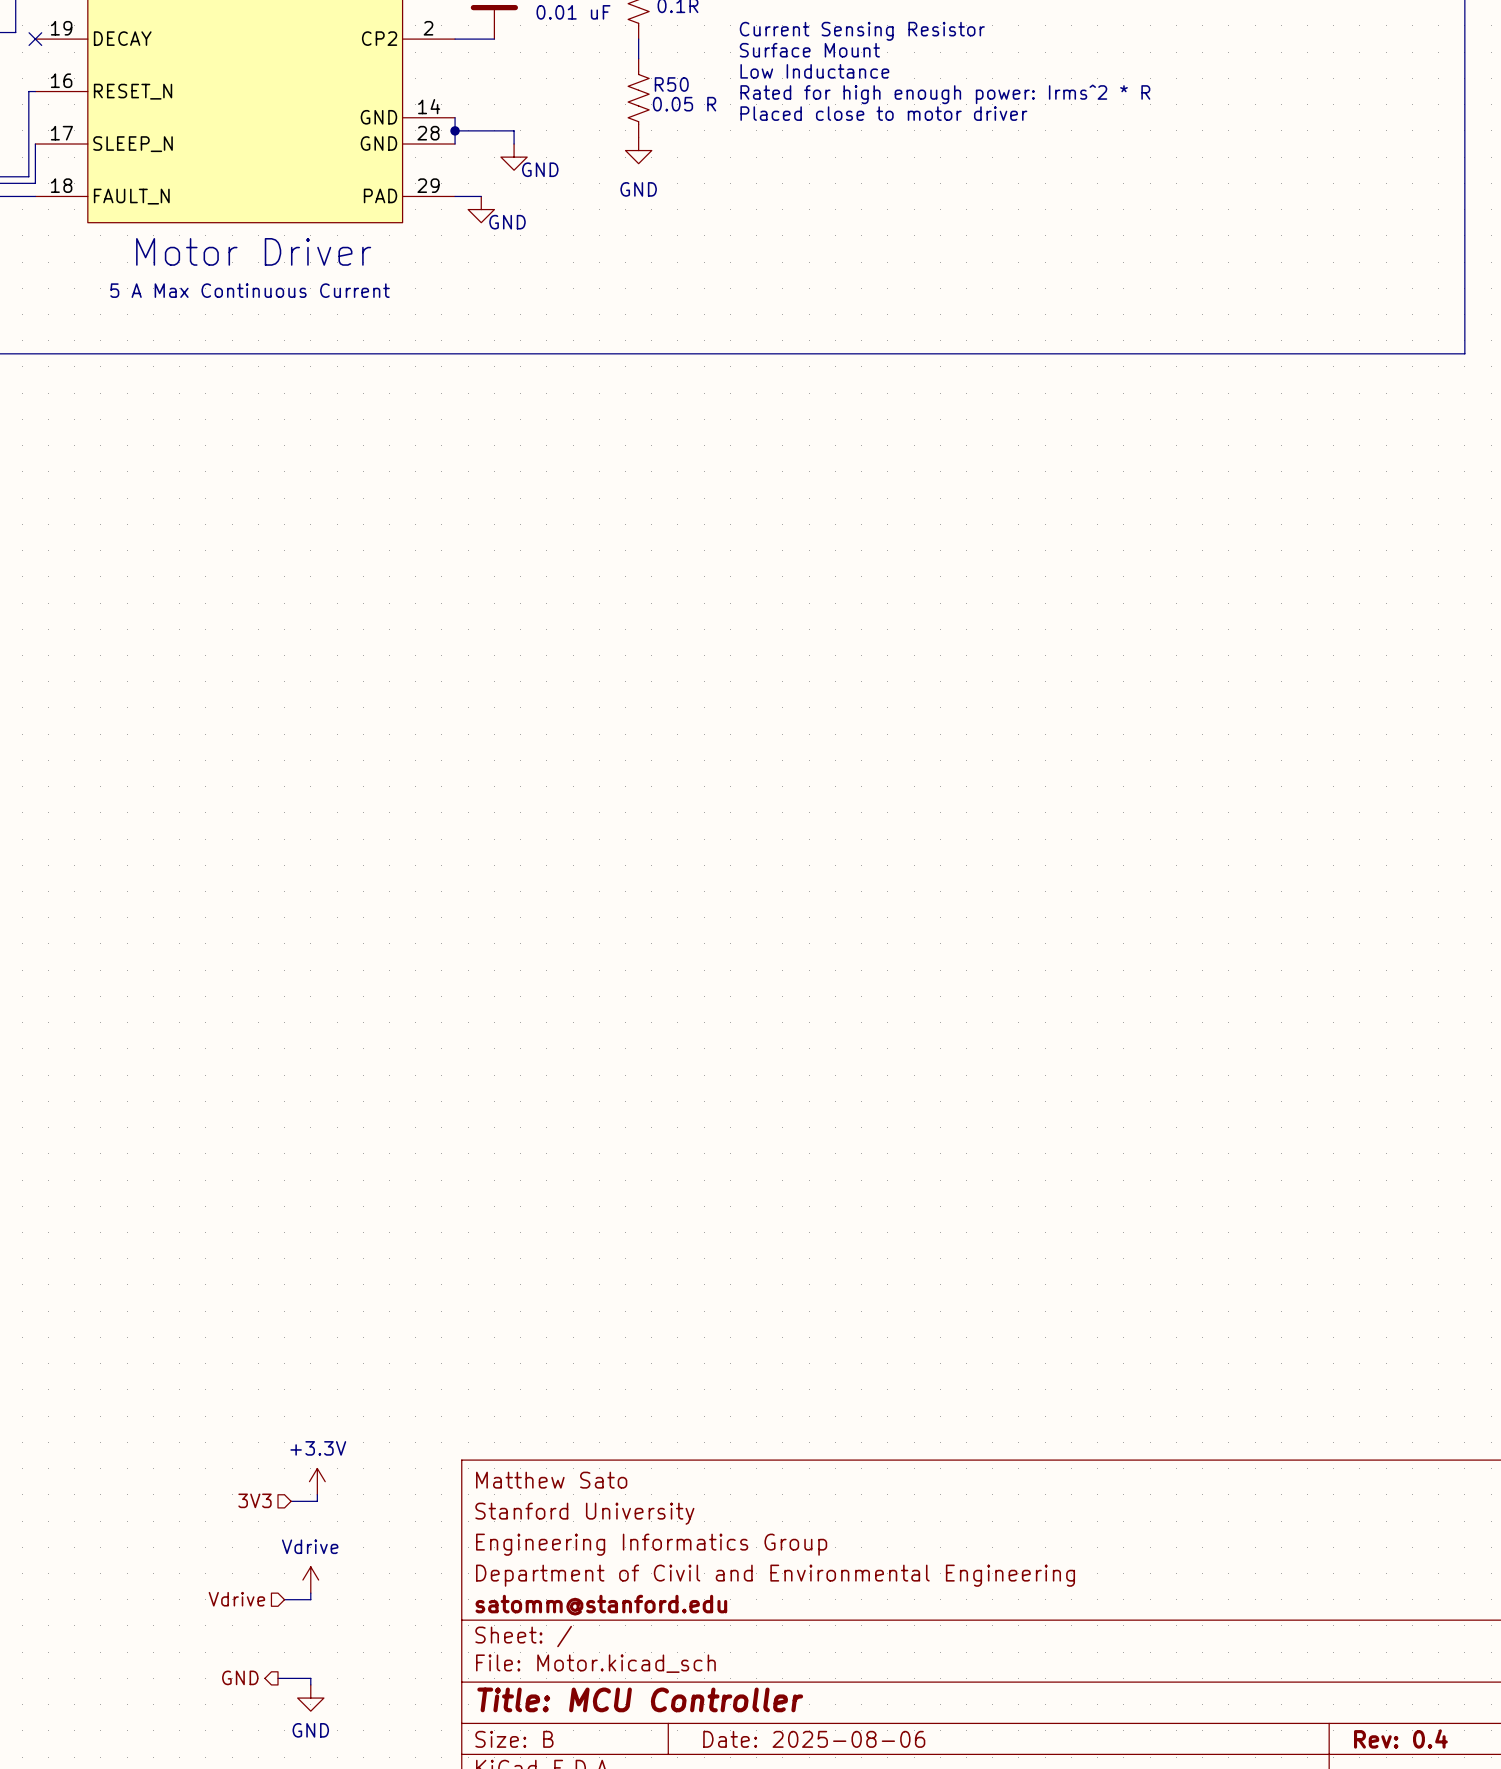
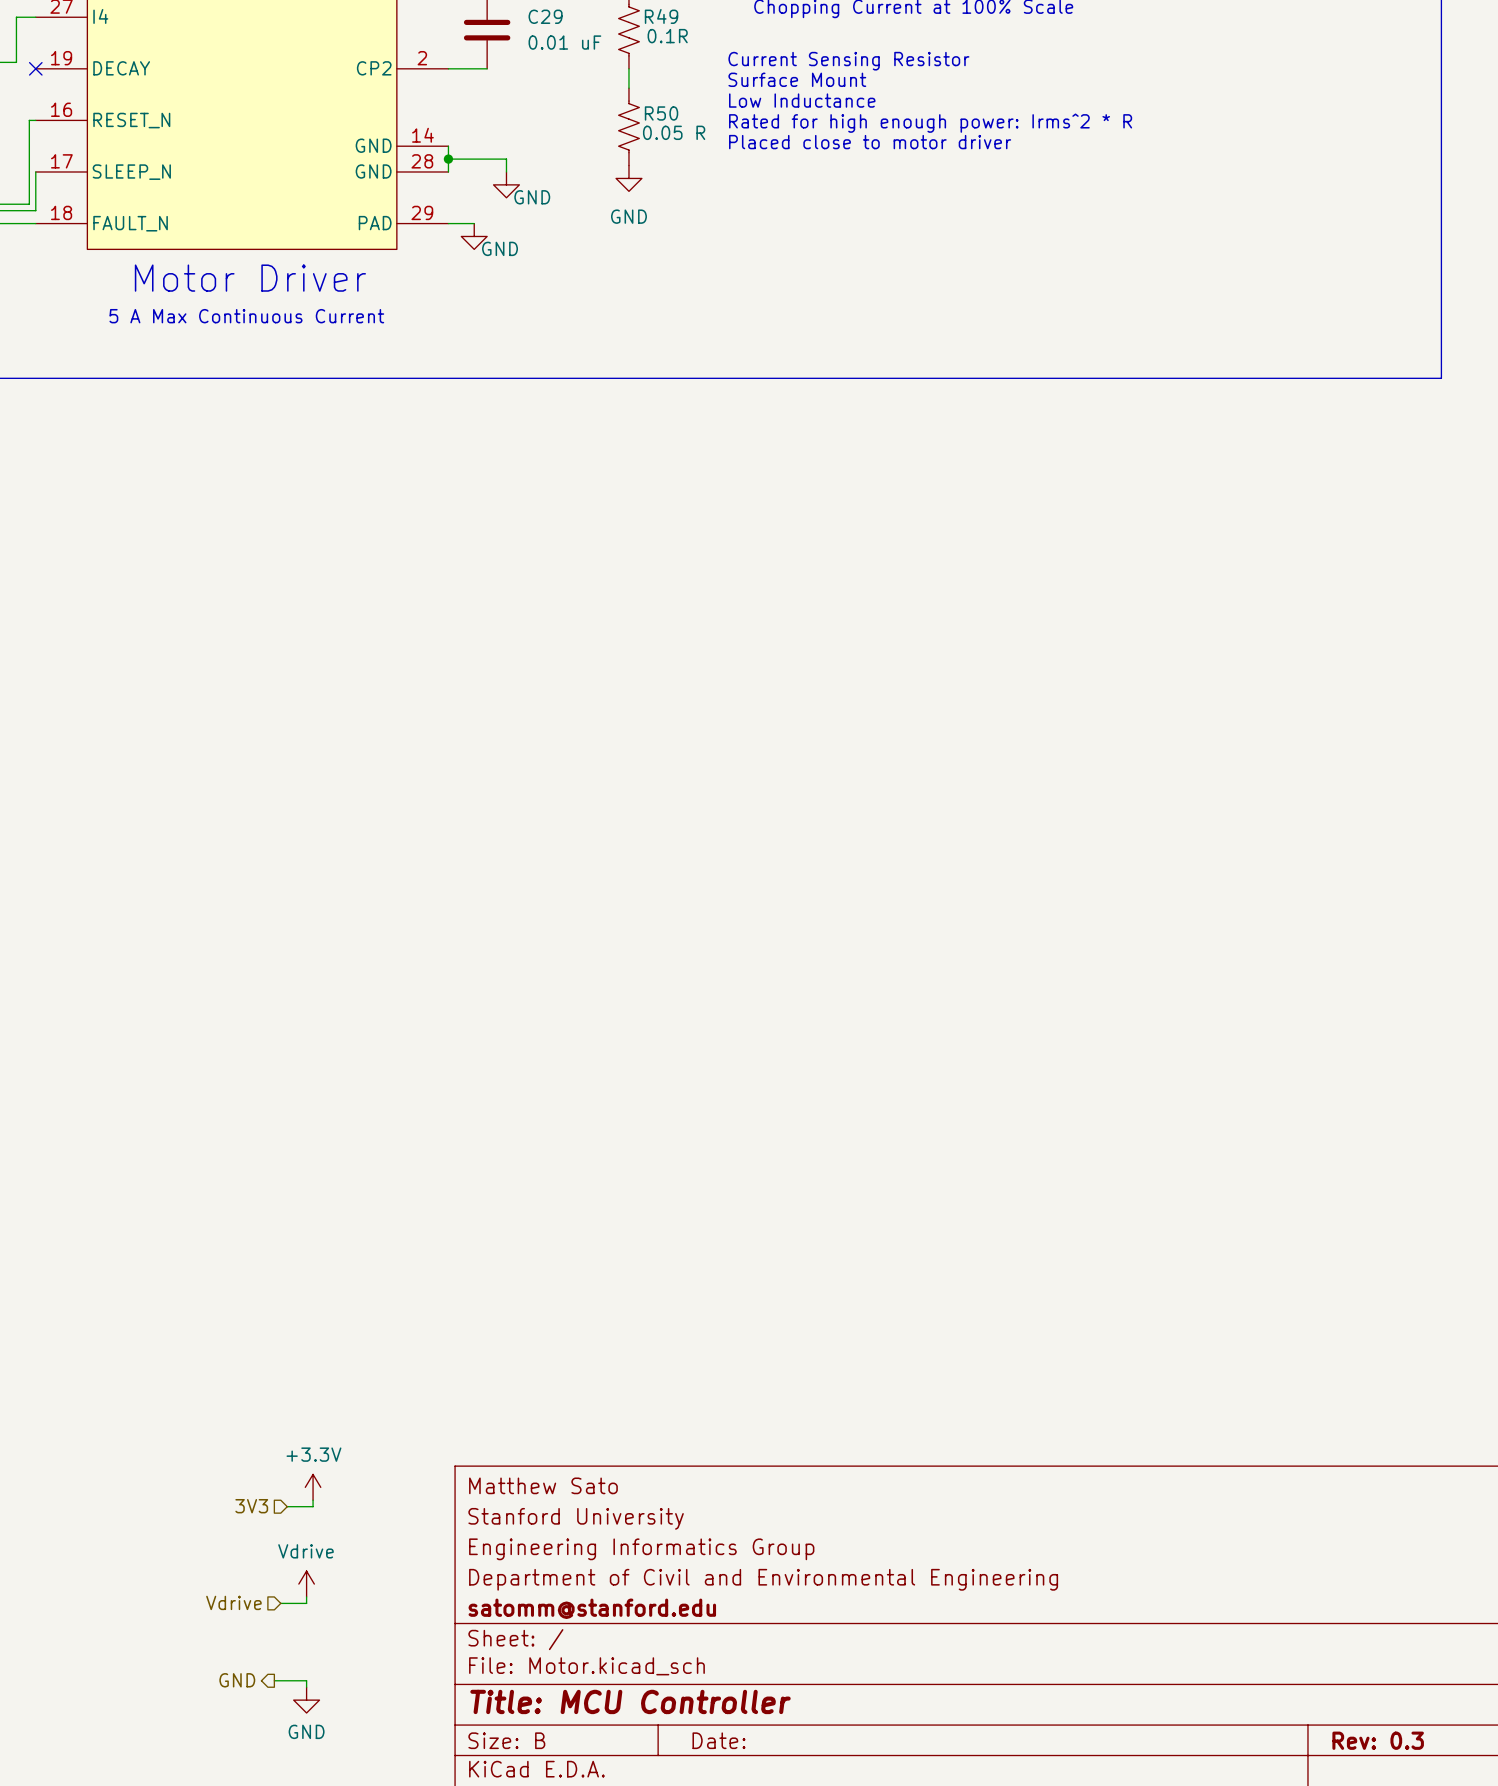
title block: Rev: 0.4 (1400, 1738) -> Rev: 0.3 (1378, 1740)
title block: Date: 2025-08-06 (814, 1739) -> Date: (718, 1740)

